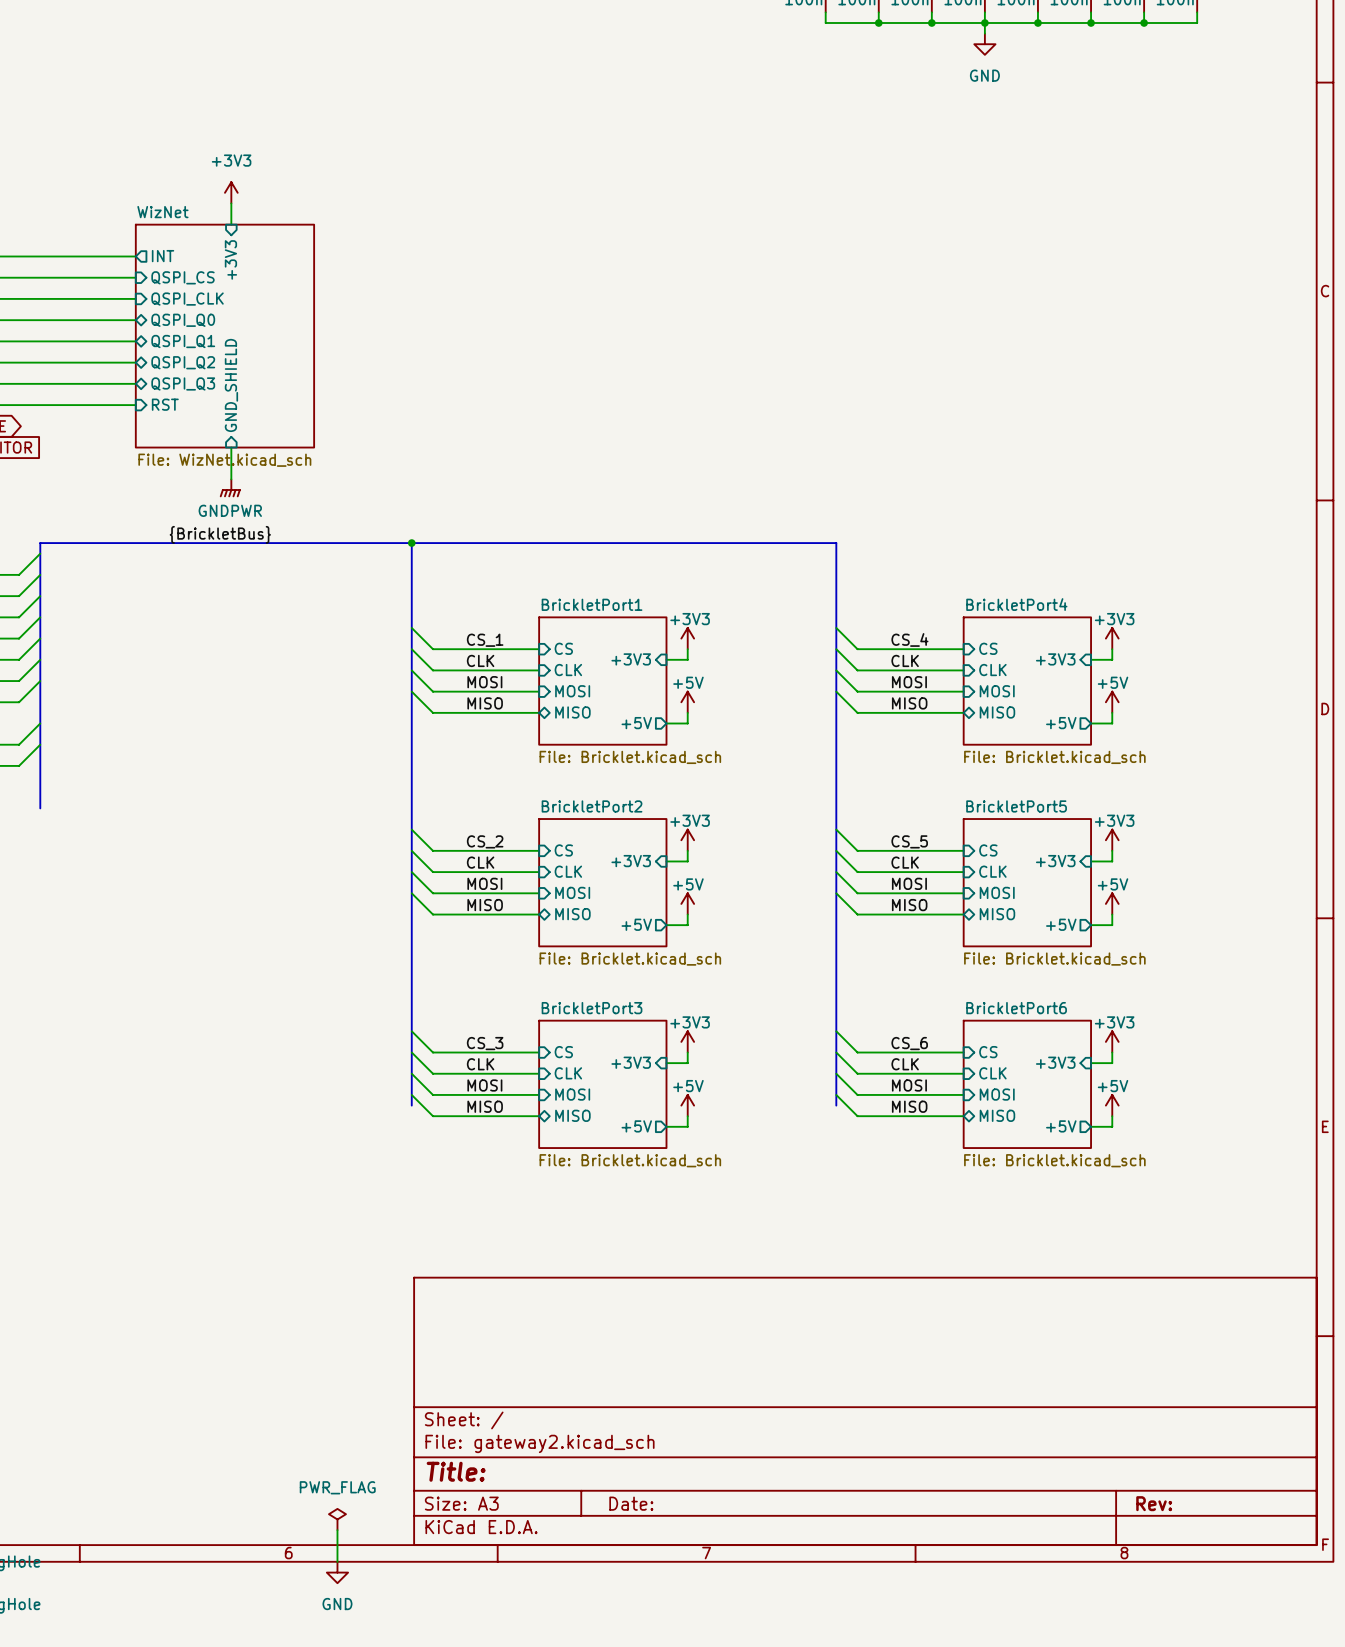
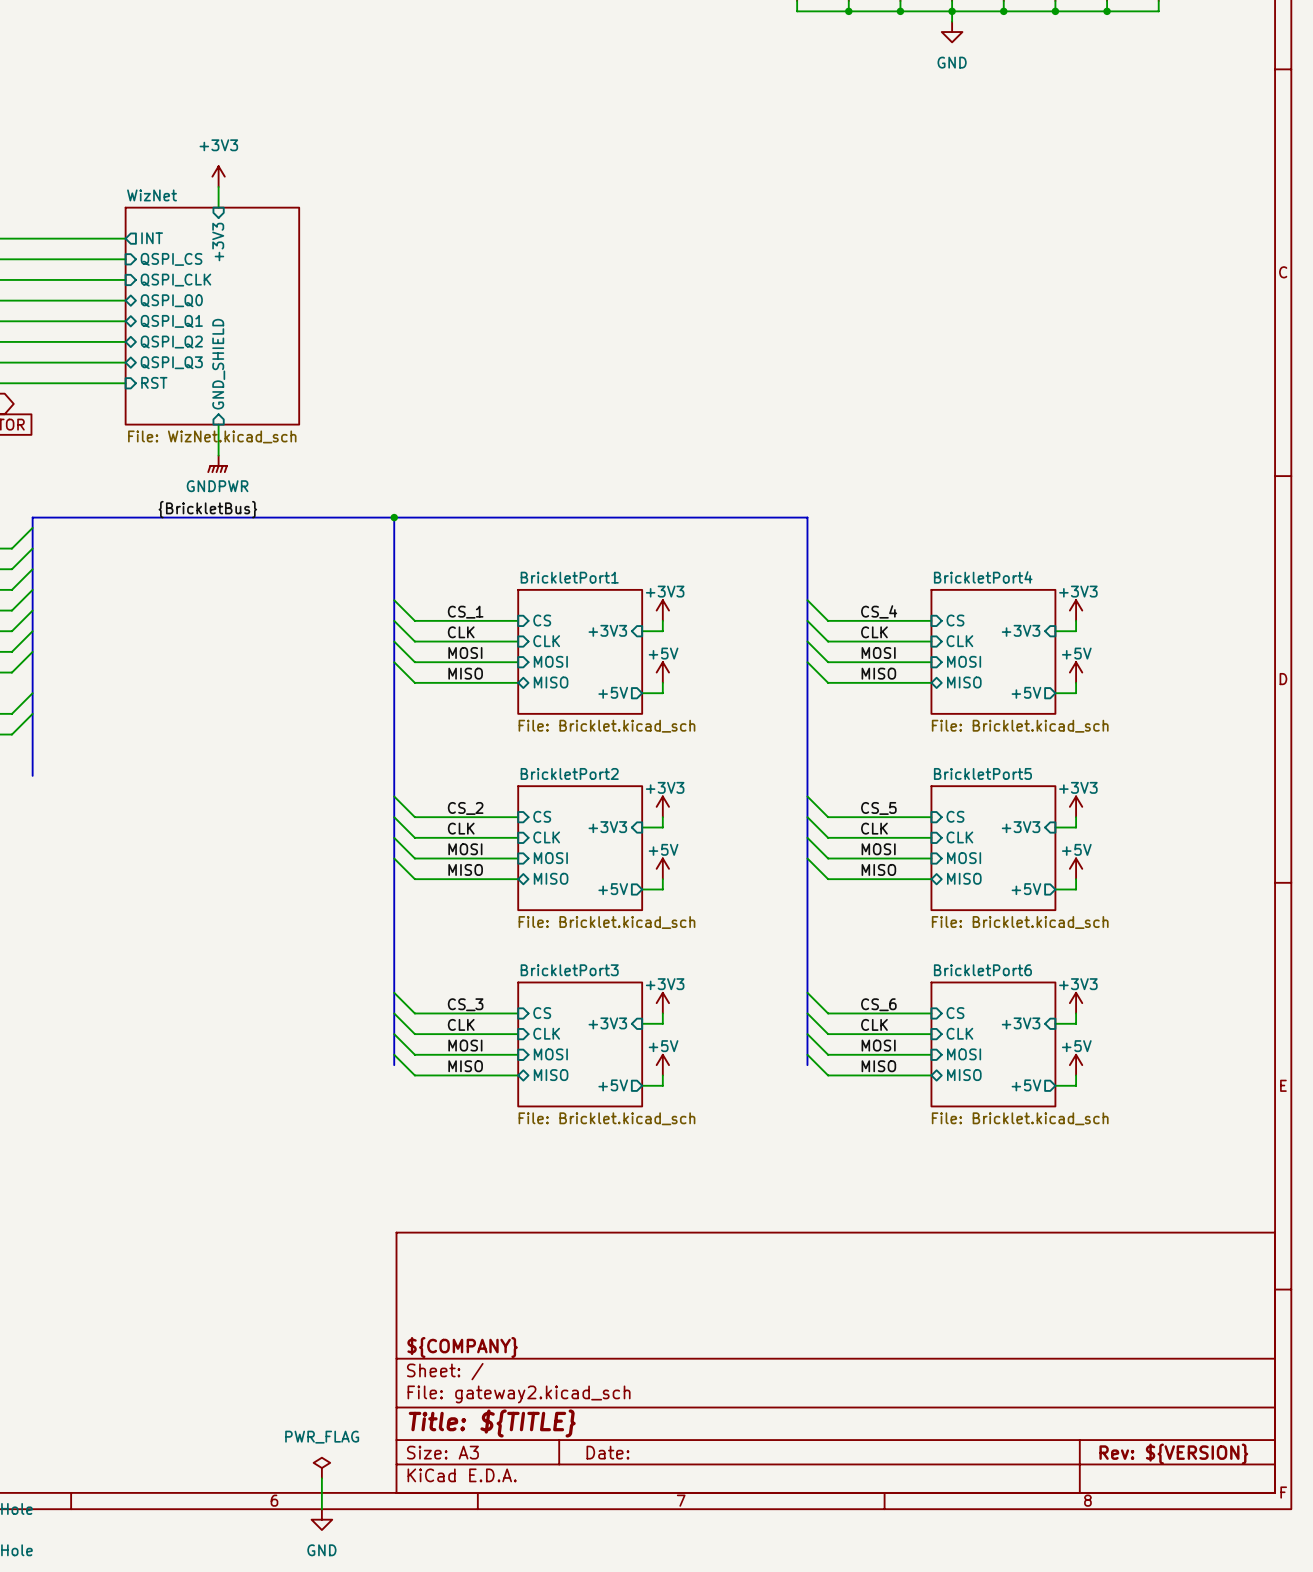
title block: none -> ${COMPANY} (462, 1347)
title block: Title: (456, 1471) -> Title: ${TITLE} (492, 1423)
title block: Rev: (1154, 1503) -> Rev: ${VERSION} (1173, 1454)

